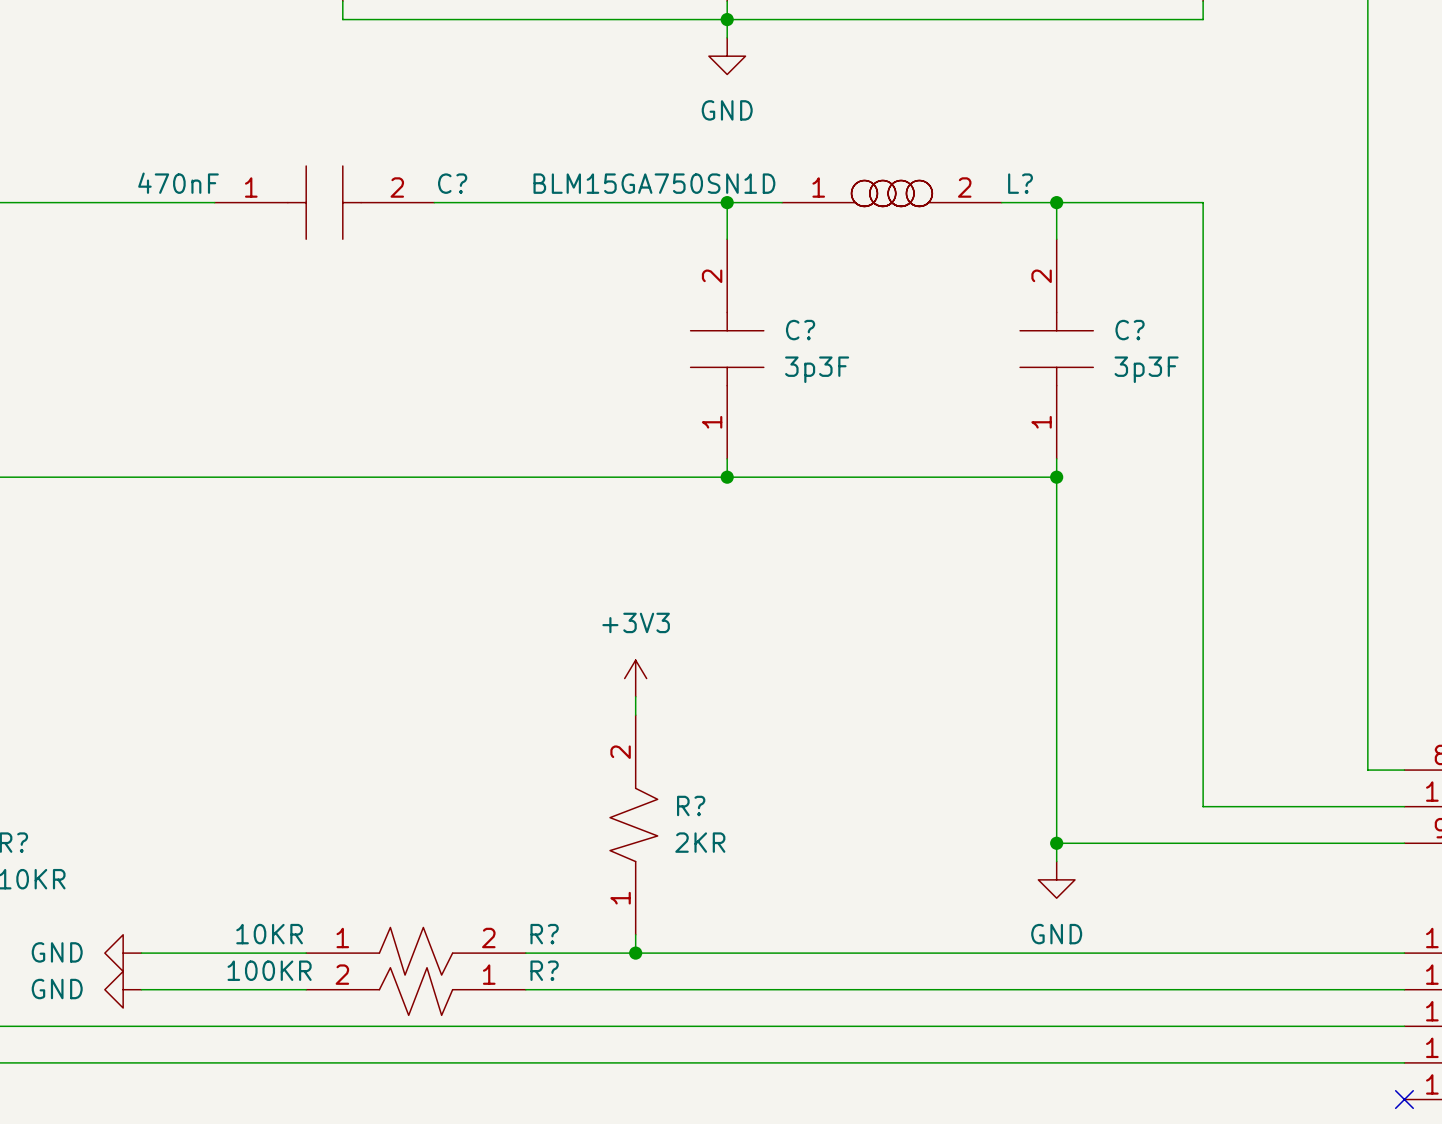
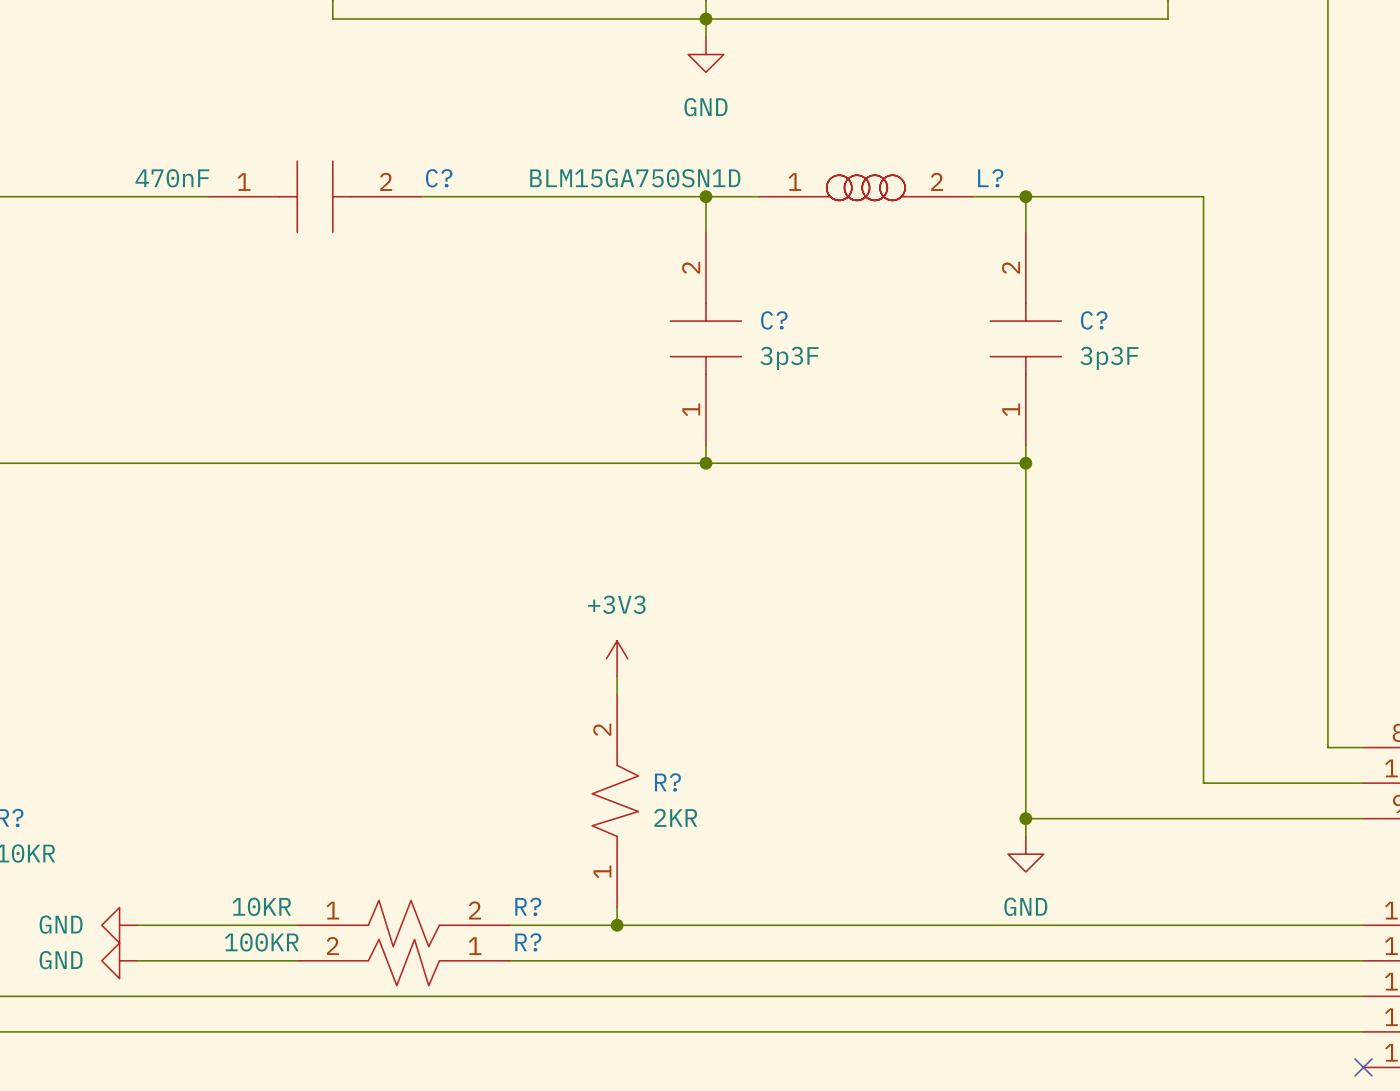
wire: (1203, 202) (1203, 806) (1239, 806) -> (1167, 196) (1203, 196) (1203, 783)

